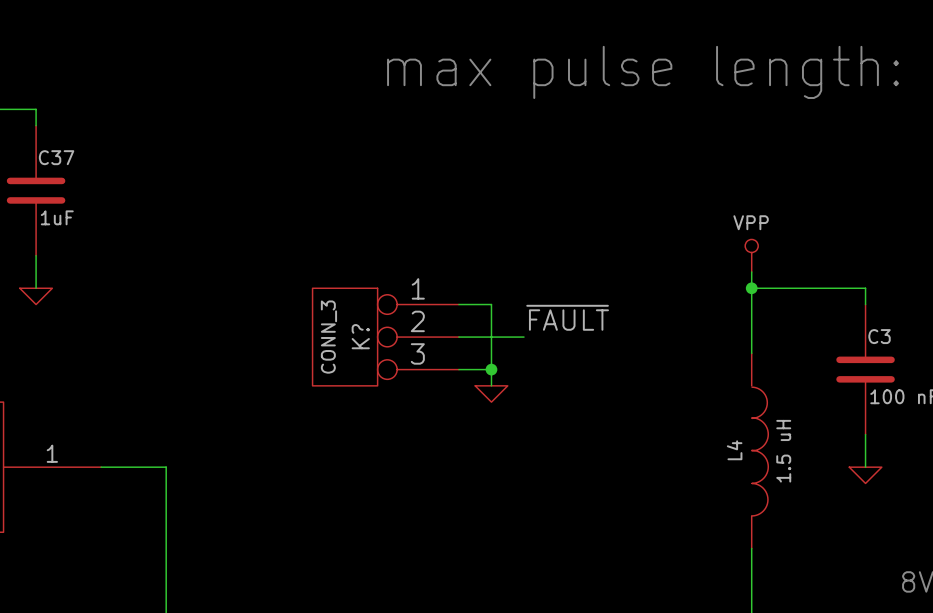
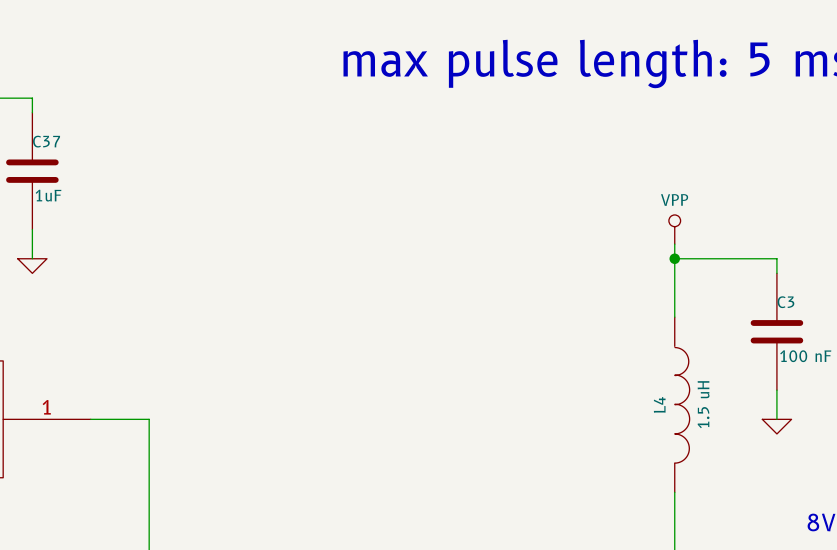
wire: (458, 304) (491, 304) (491, 385) -> none
label: ~{FAULT} (567, 317) -> none
K?: CONN_3 (385, 337) -> none
wire: (458, 337) (524, 337) -> none
wire: (458, 369) (491, 369) -> none
junction: (491, 369) -> none
power symbol: (491, 393) -> none

